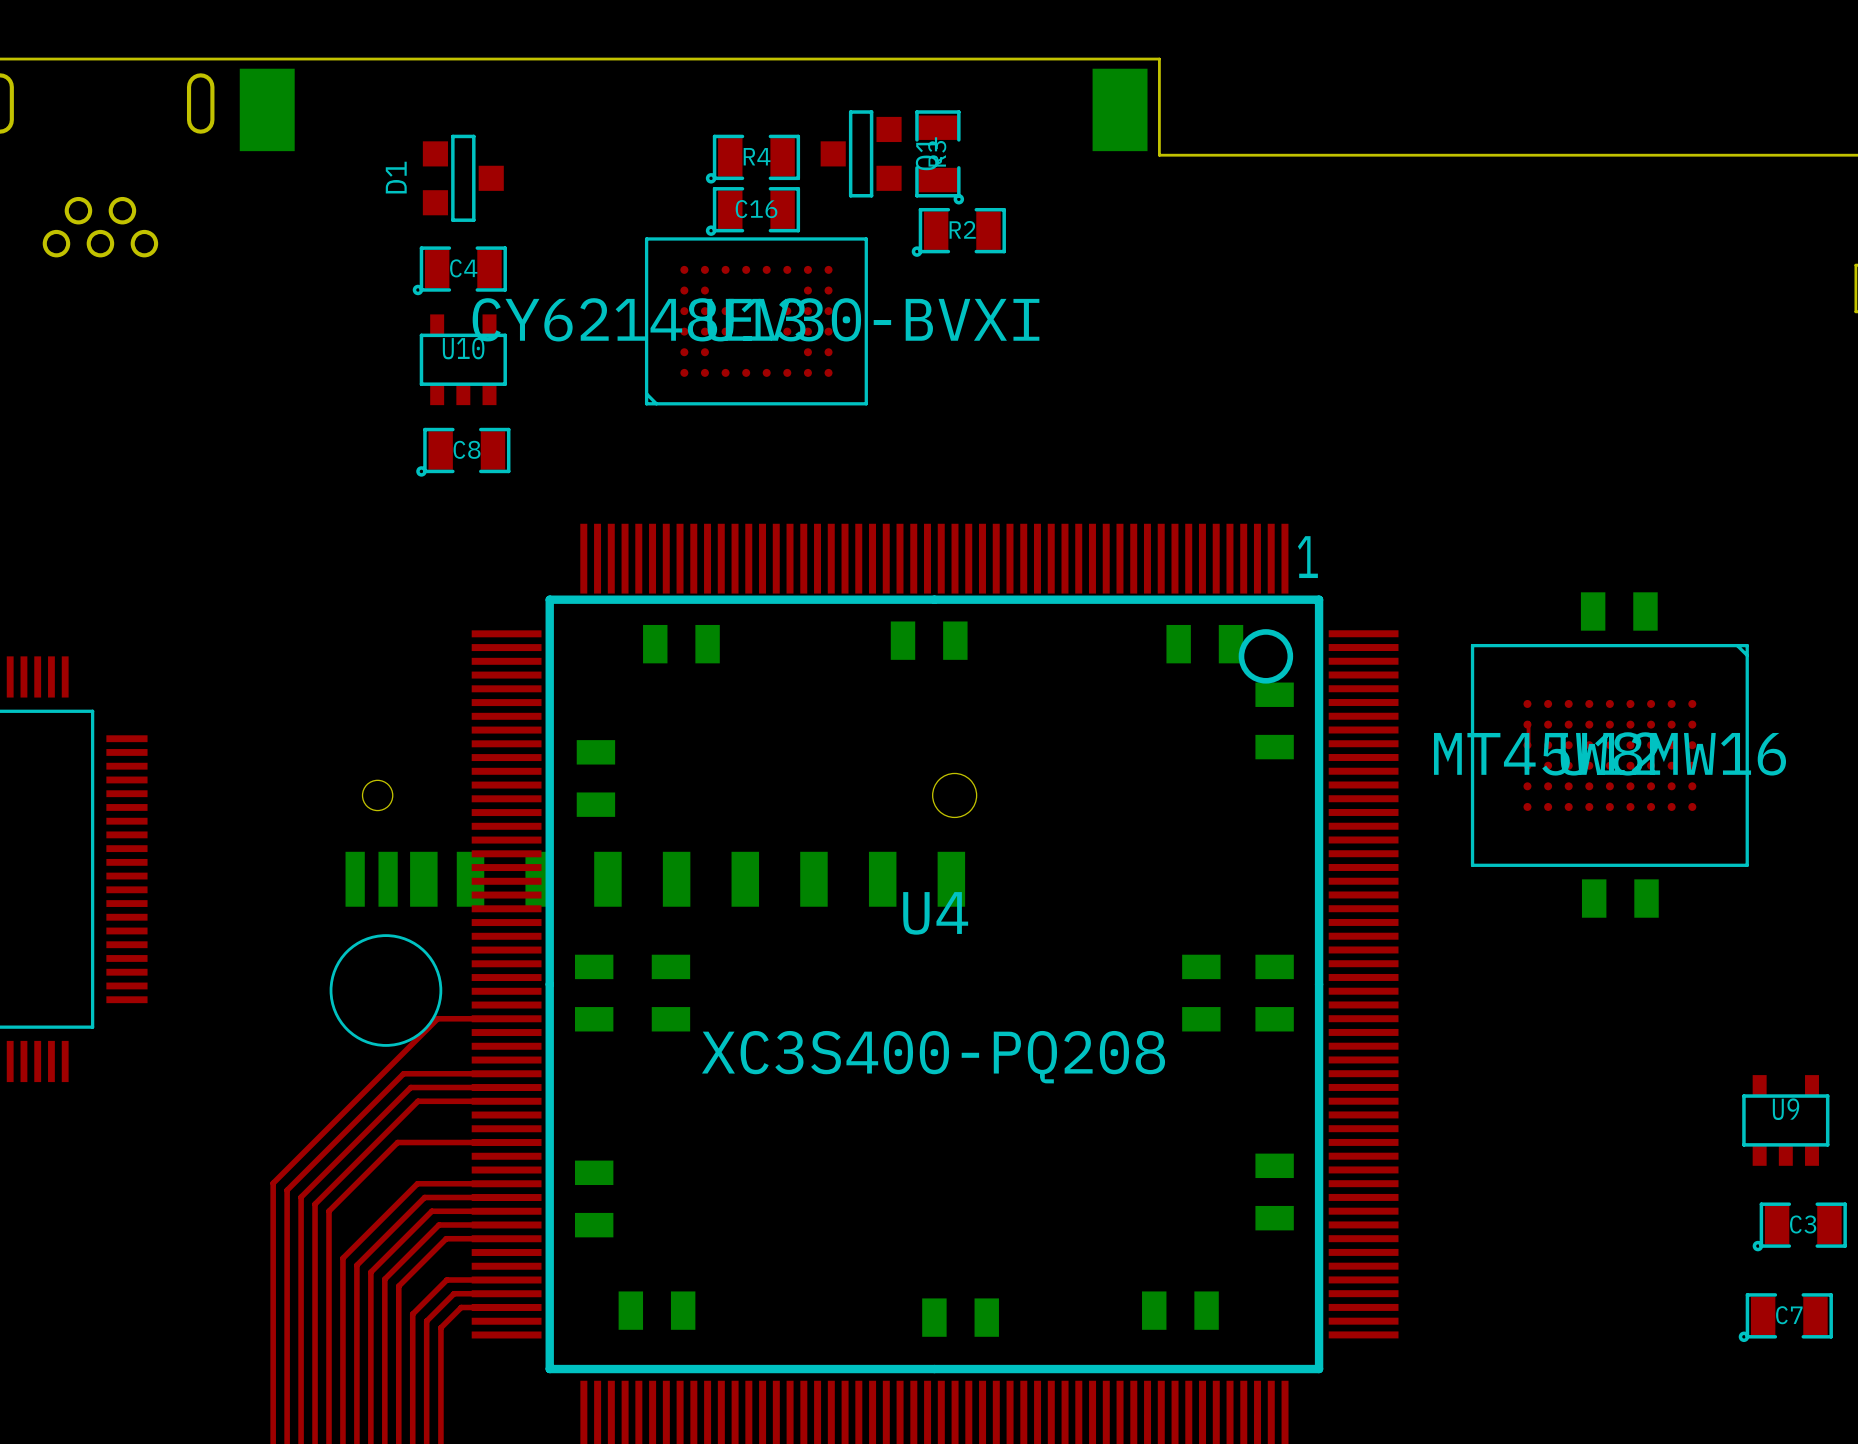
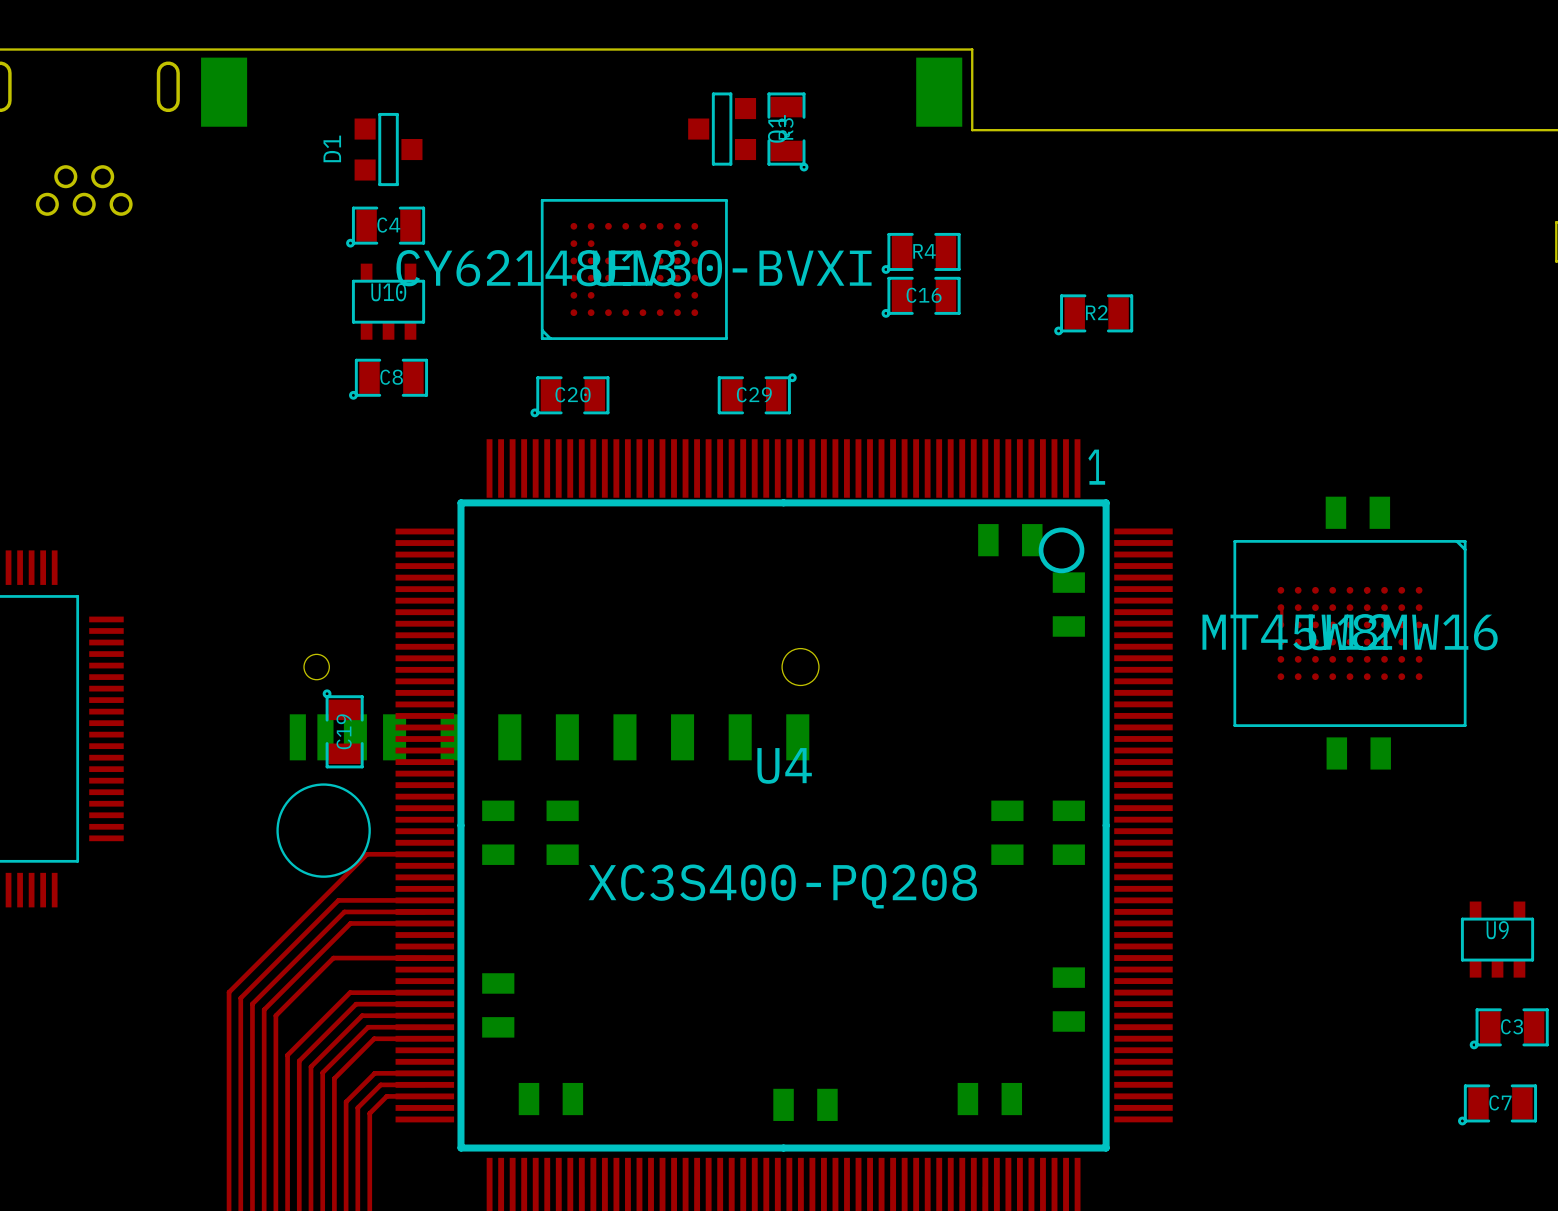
R4 position: (752, 159) -> (921, 253)
C16 position: (752, 211) -> (921, 297)
R2 position: (958, 232) -> (1093, 314)
C29 side: bottom (929, 640) -> top (757, 393)
C20 side: bottom (681, 644) -> top (569, 396)
C19 side: bottom (595, 778) -> top (343, 728)

